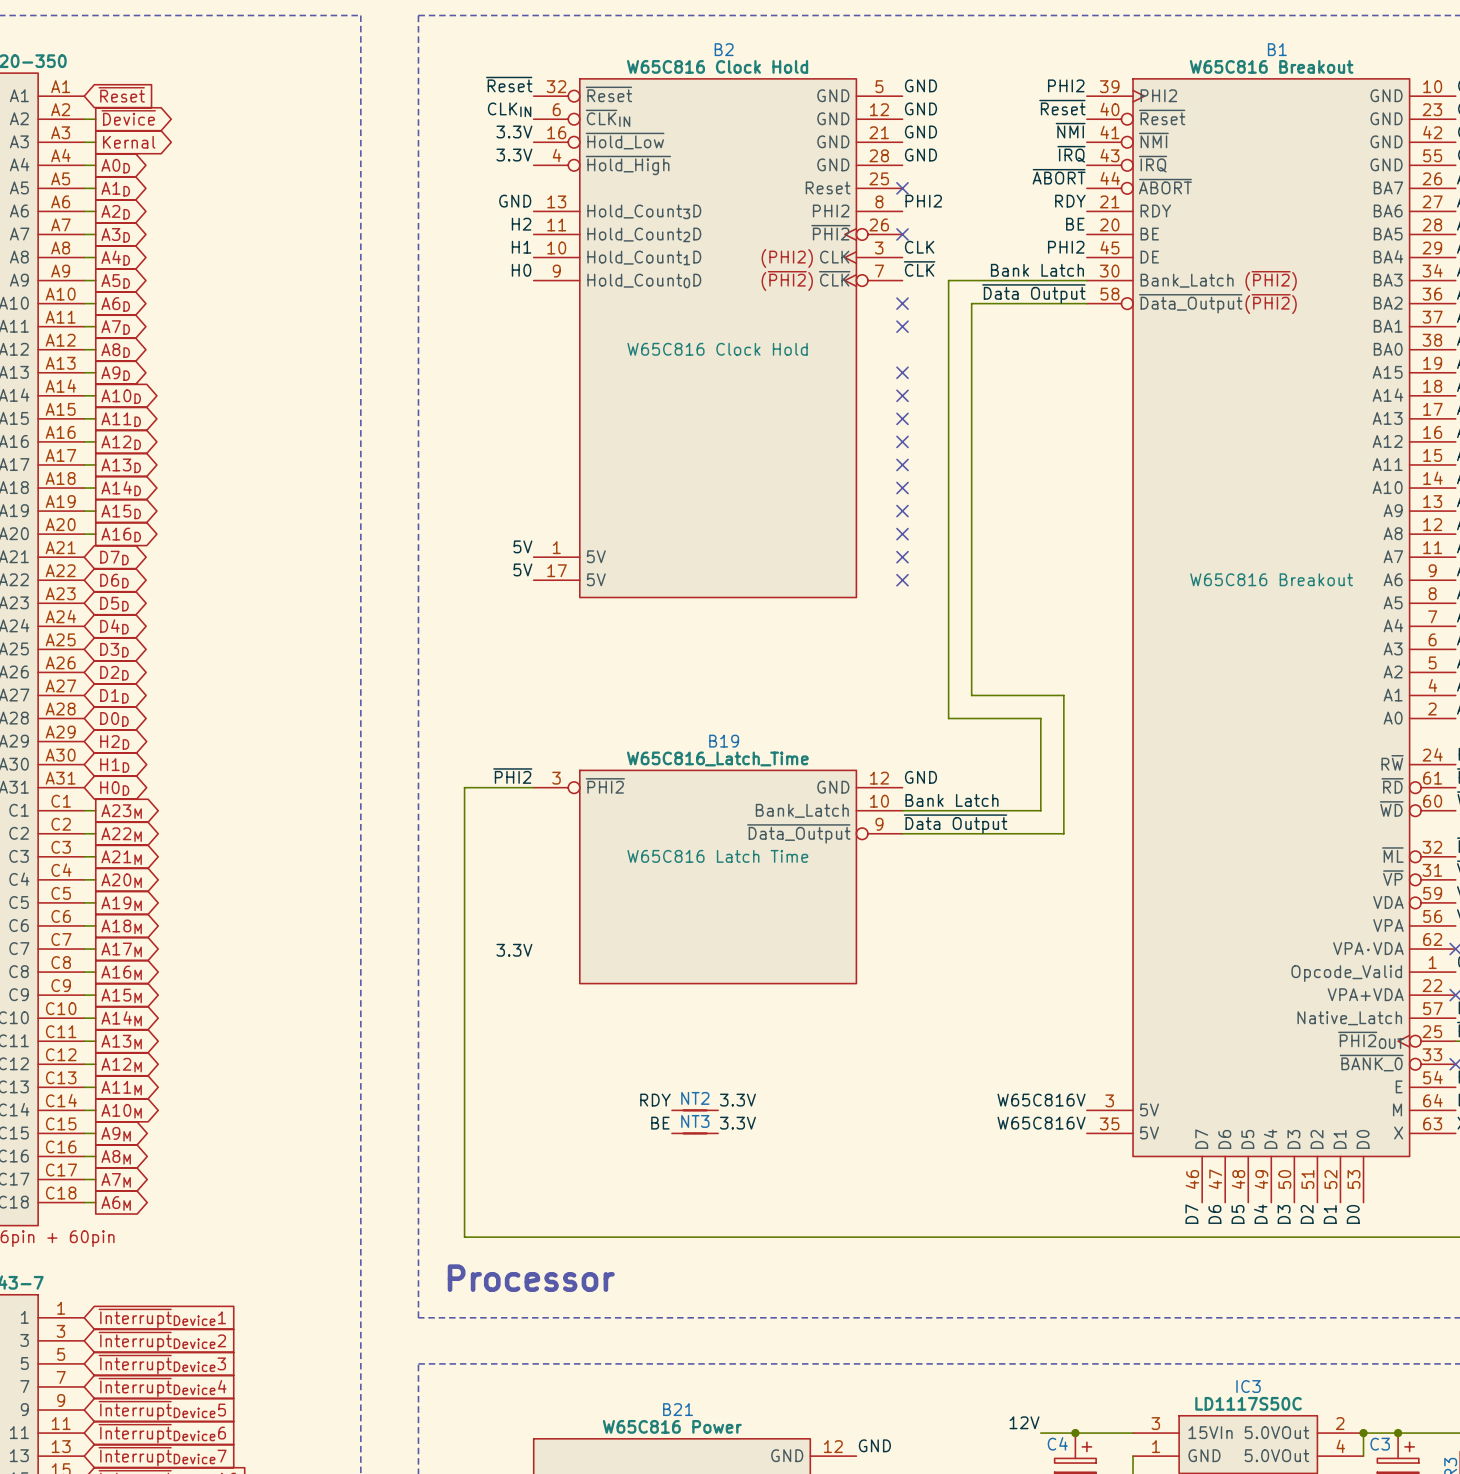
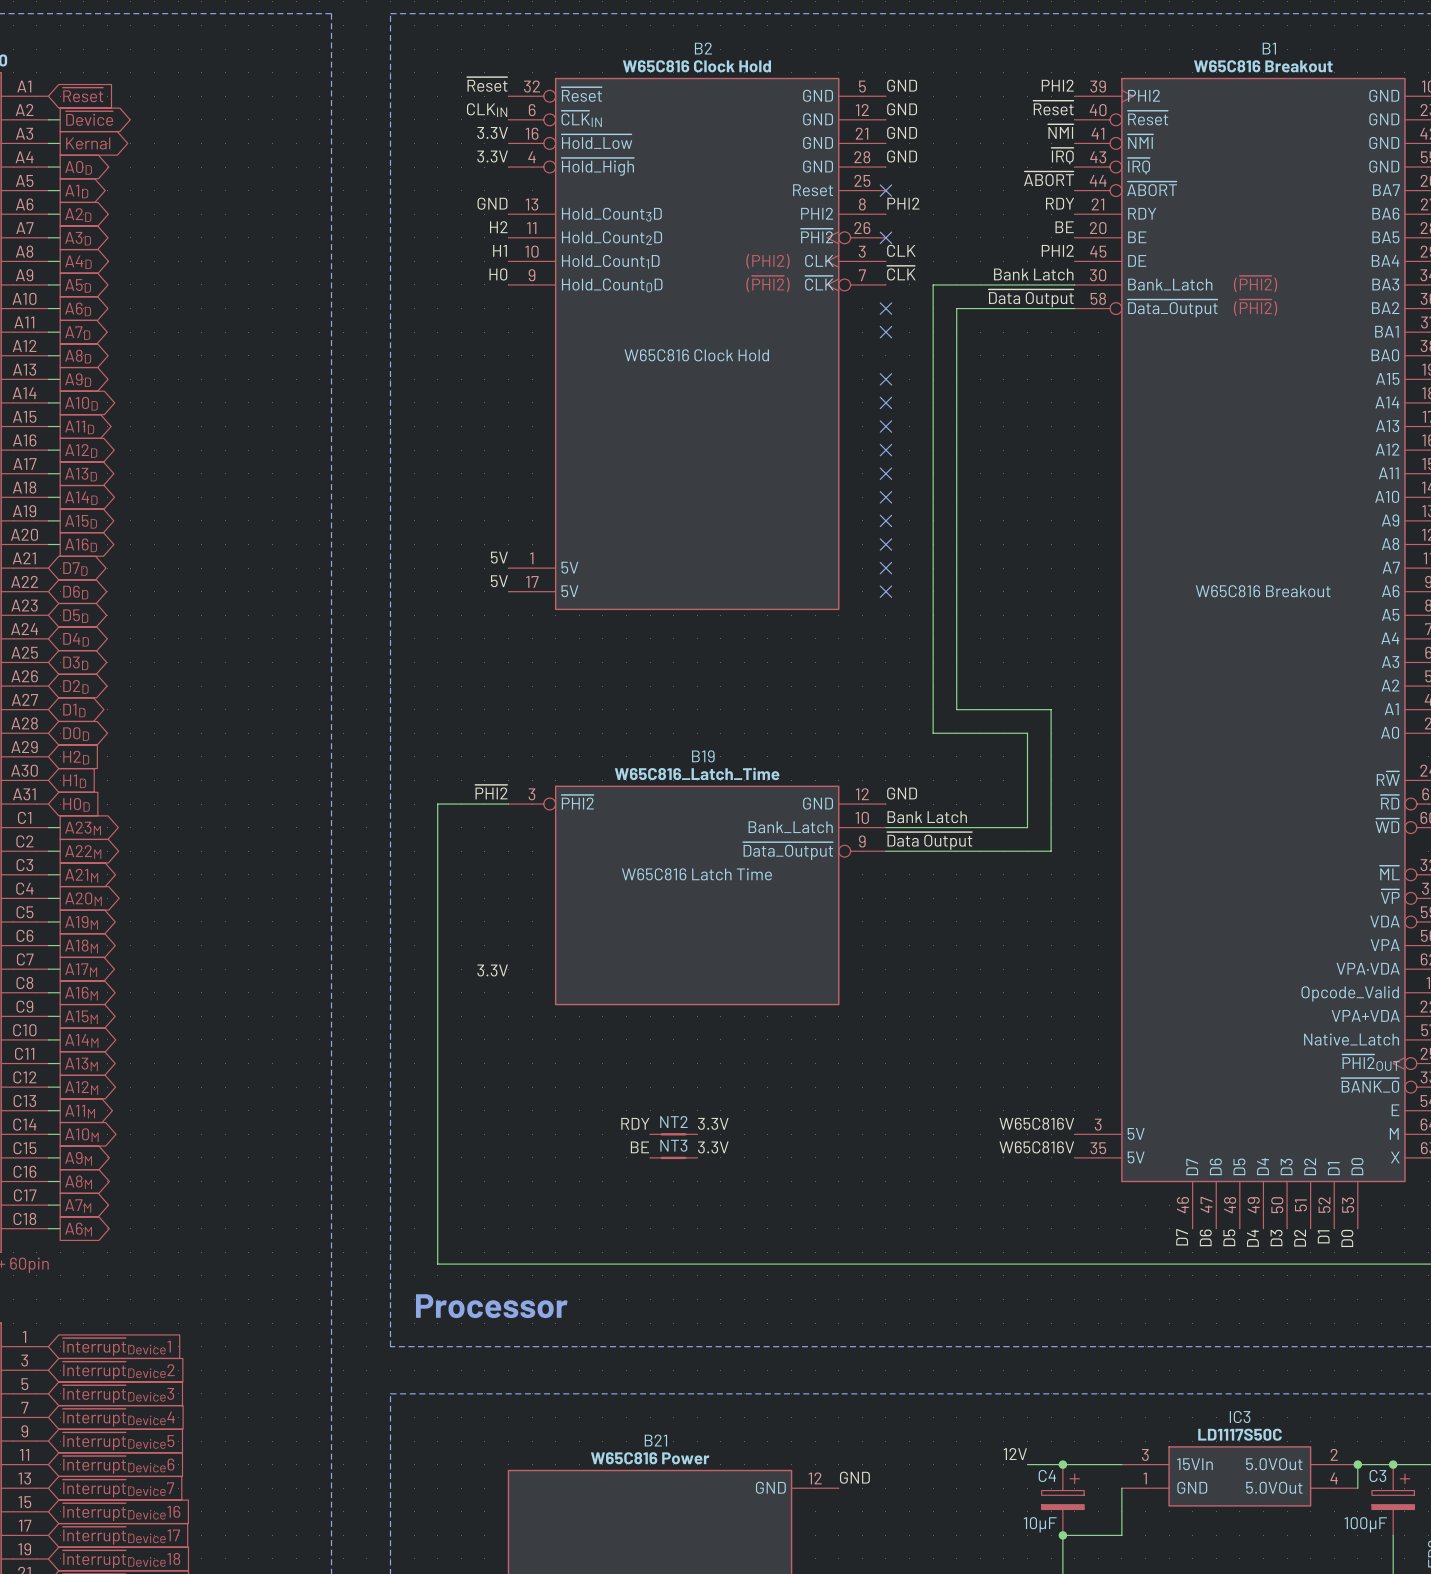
global label shape: bidirectional (114, 742) -> input (76, 757)
global label shape: bidirectional (114, 765) -> input (74, 781)
global label shape: bidirectional (114, 788) -> input (76, 804)

